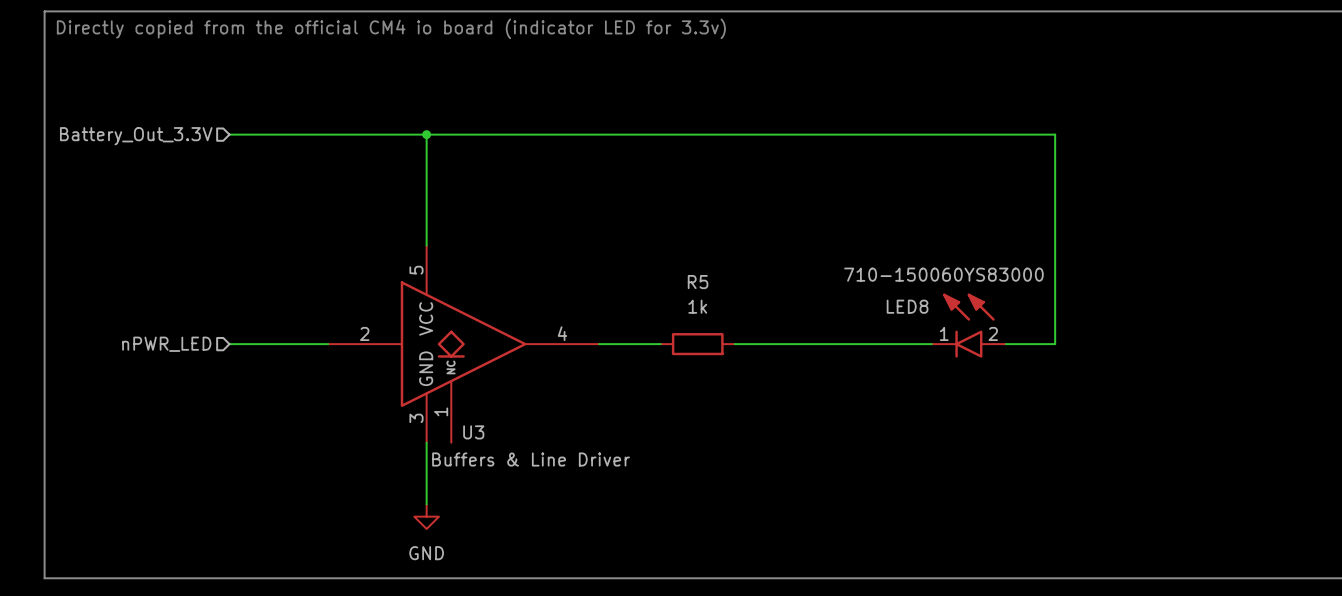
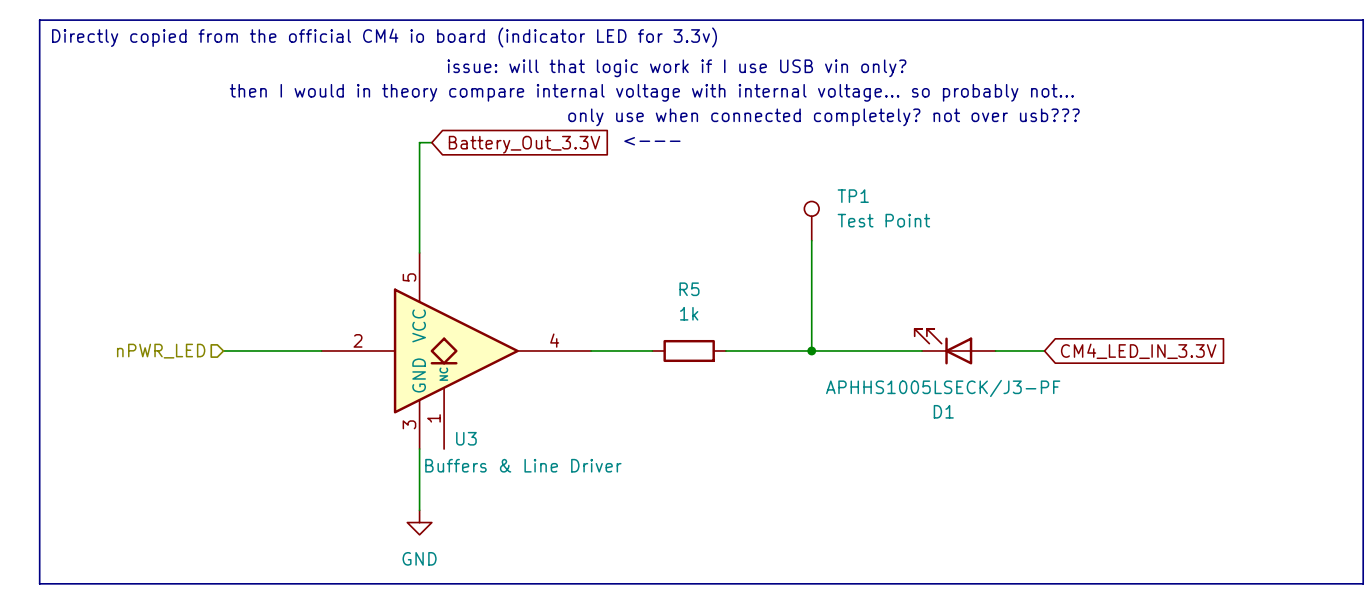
text: none -> issue: will that logic work if I use USB vin only? (676, 68)
text: none -> then I would in theory compare internal voltage with internal voltage... so probably not... (651, 92)
text: none -> only use when connected completely? not over usb??? (823, 117)
text: none -> <--- (652, 141)
wire: (229, 134) (426, 134) -> none
junction: (426, 134) -> none
wire: (438, 134) (1055, 134) (1055, 344) -> none
hierarchical label: Battery_Out_3.3V (136, 136) -> none
global label: none -> Battery_Out_3.3V (524, 144)
TP1: none -> Test Point (811, 221)
wire: none -> (811, 240) (811, 350)
LED8: 710-150060YS83000 (968, 325) -> none
D1: none -> APHHS1005LSECK/J3-PF (955, 346)
junction: none -> (811, 350)
global label: none -> CM4_LED_IN_3.3V (1138, 351)

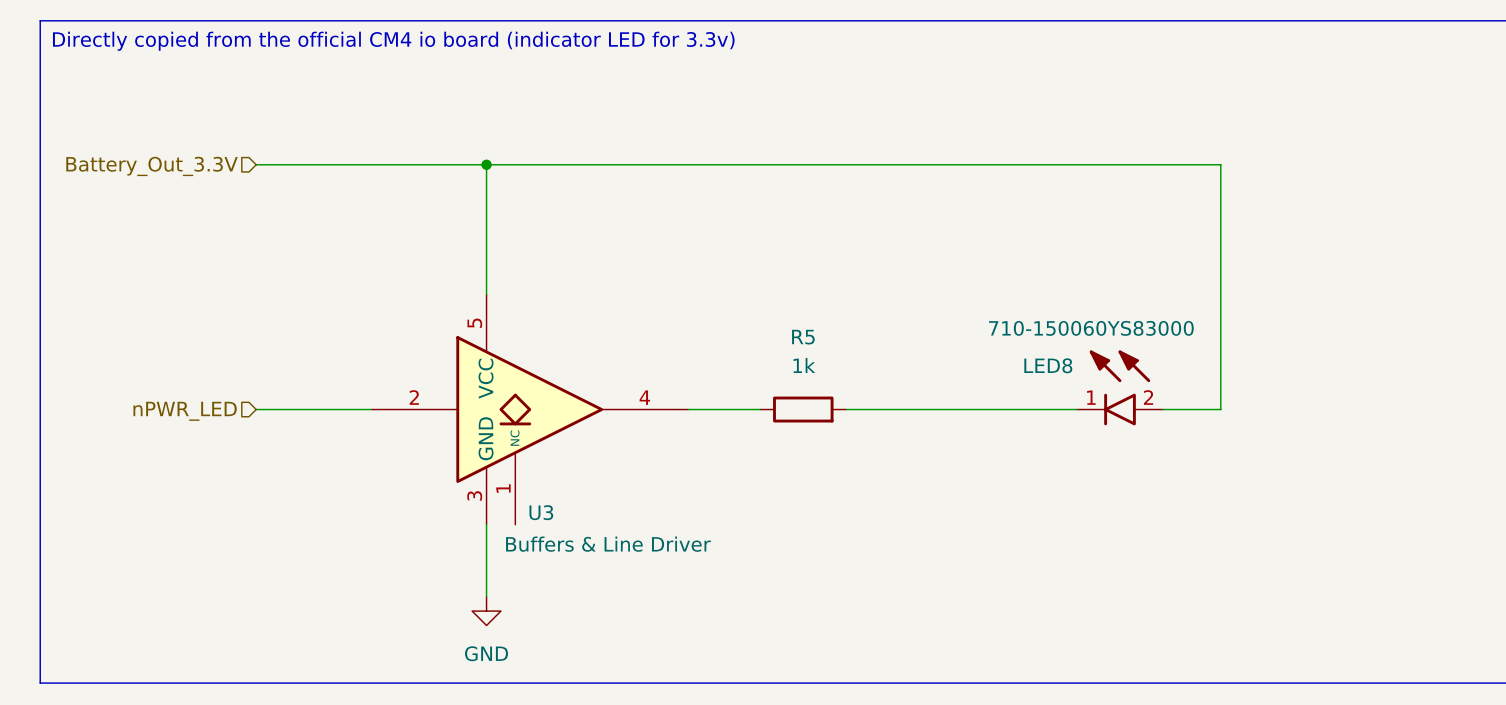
text: issue: will that logic work if I use USB vin only? (676, 68) -> none
text: then I would in theory compare internal voltage with internal voltage... so probably not... (651, 92) -> none
text: only use when connected completely? not over usb??? (823, 117) -> none
text: <--- (652, 141) -> none
wire: none -> (256, 164) (486, 164)
junction: none -> (486, 164)
wire: none -> (500, 164) (1220, 164) (1220, 409)
hierarchical label: none -> Battery_Out_3.3V (152, 166)
global label: Battery_Out_3.3V (524, 144) -> none
TP1: Test Point (811, 221) -> none
wire: (811, 240) (811, 350) -> none
LED8: none -> 710-150060YS83000 (1120, 387)
D1: APHHS1005LSECK/J3-PF (955, 346) -> none
junction: (811, 350) -> none
global label: CM4_LED_IN_3.3V (1138, 351) -> none

